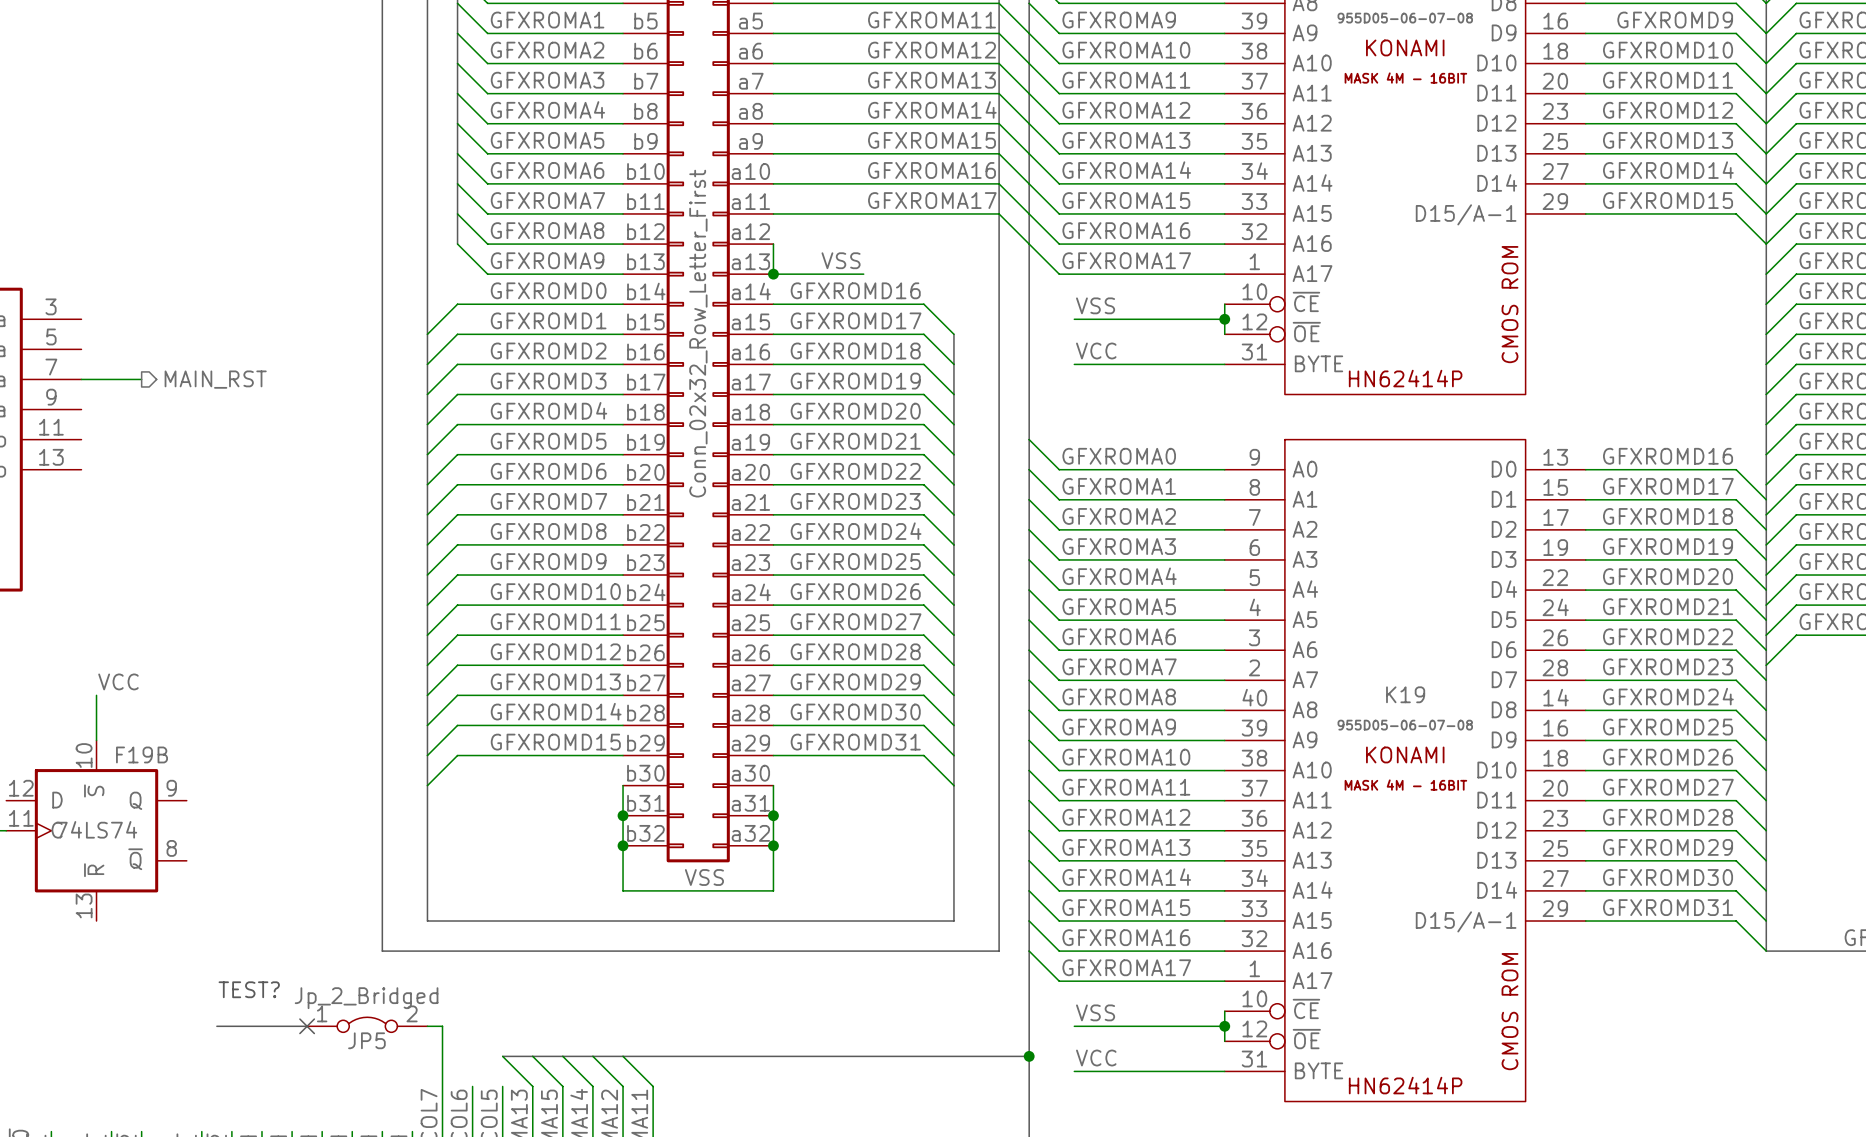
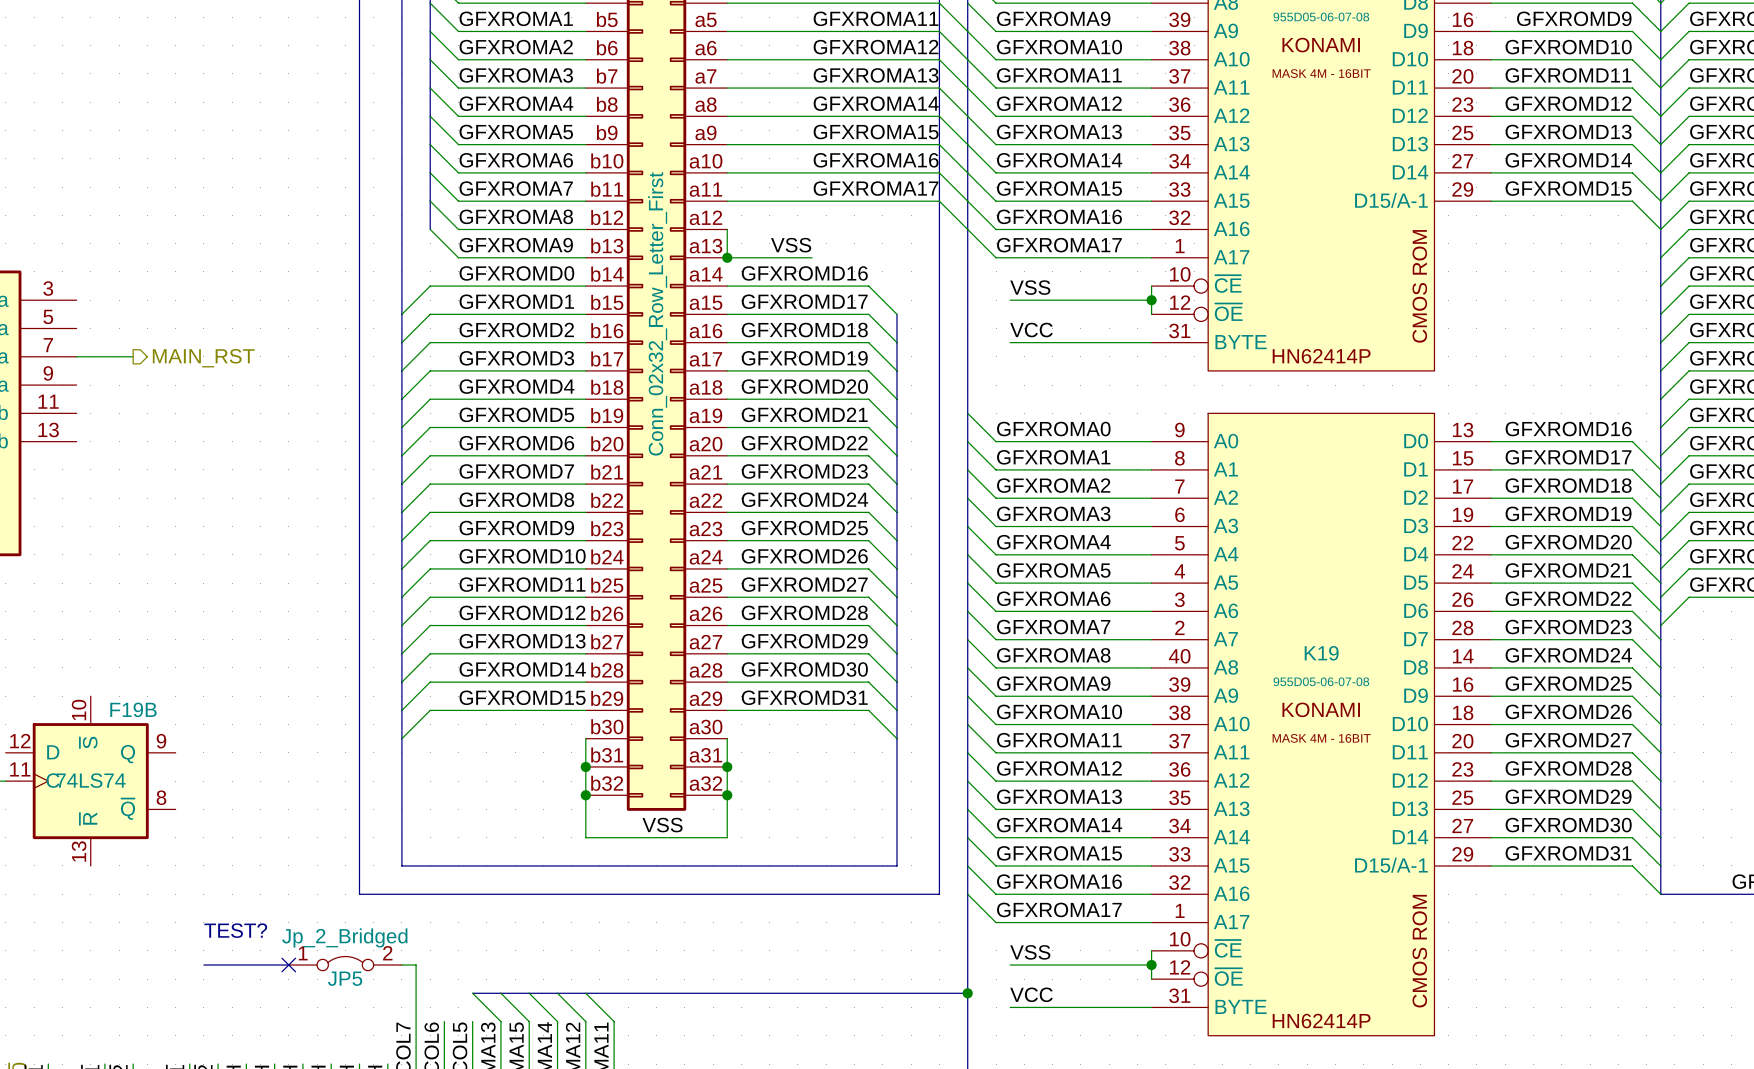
label: VCC (118, 681) -> none
wire: (96, 695) (96, 740) -> none

